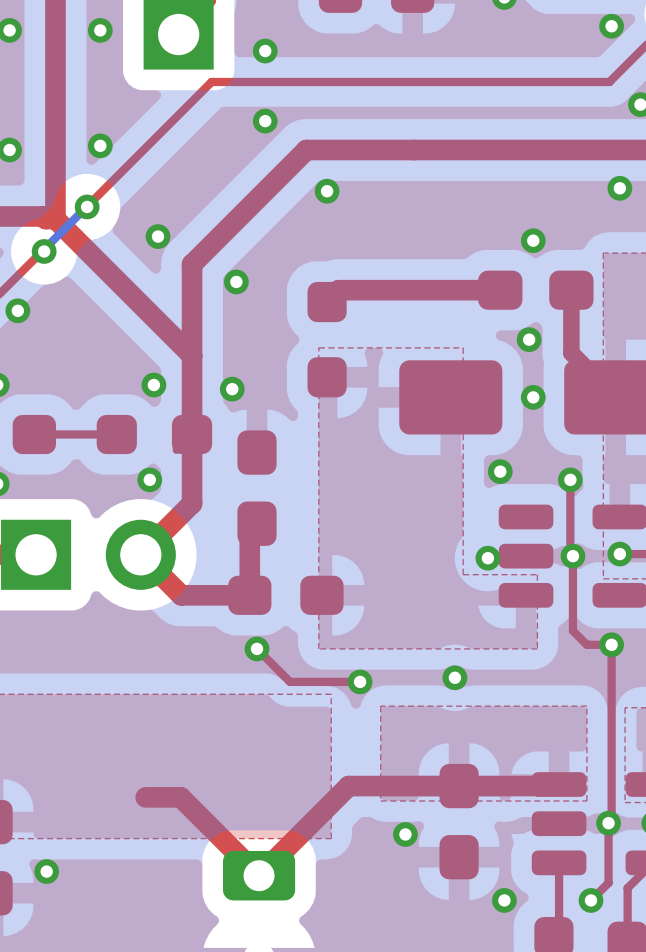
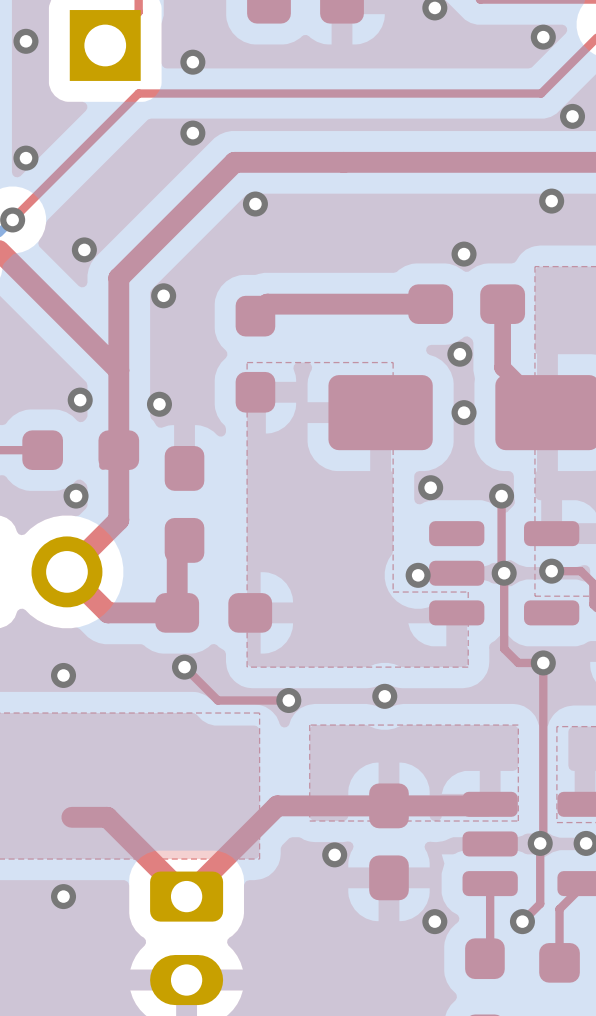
via: none -> (63, 675)
via: none -> (63, 896)

